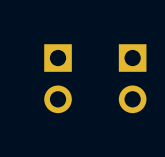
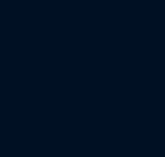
part: (58, 78) -> none
part: (132, 78) -> none

